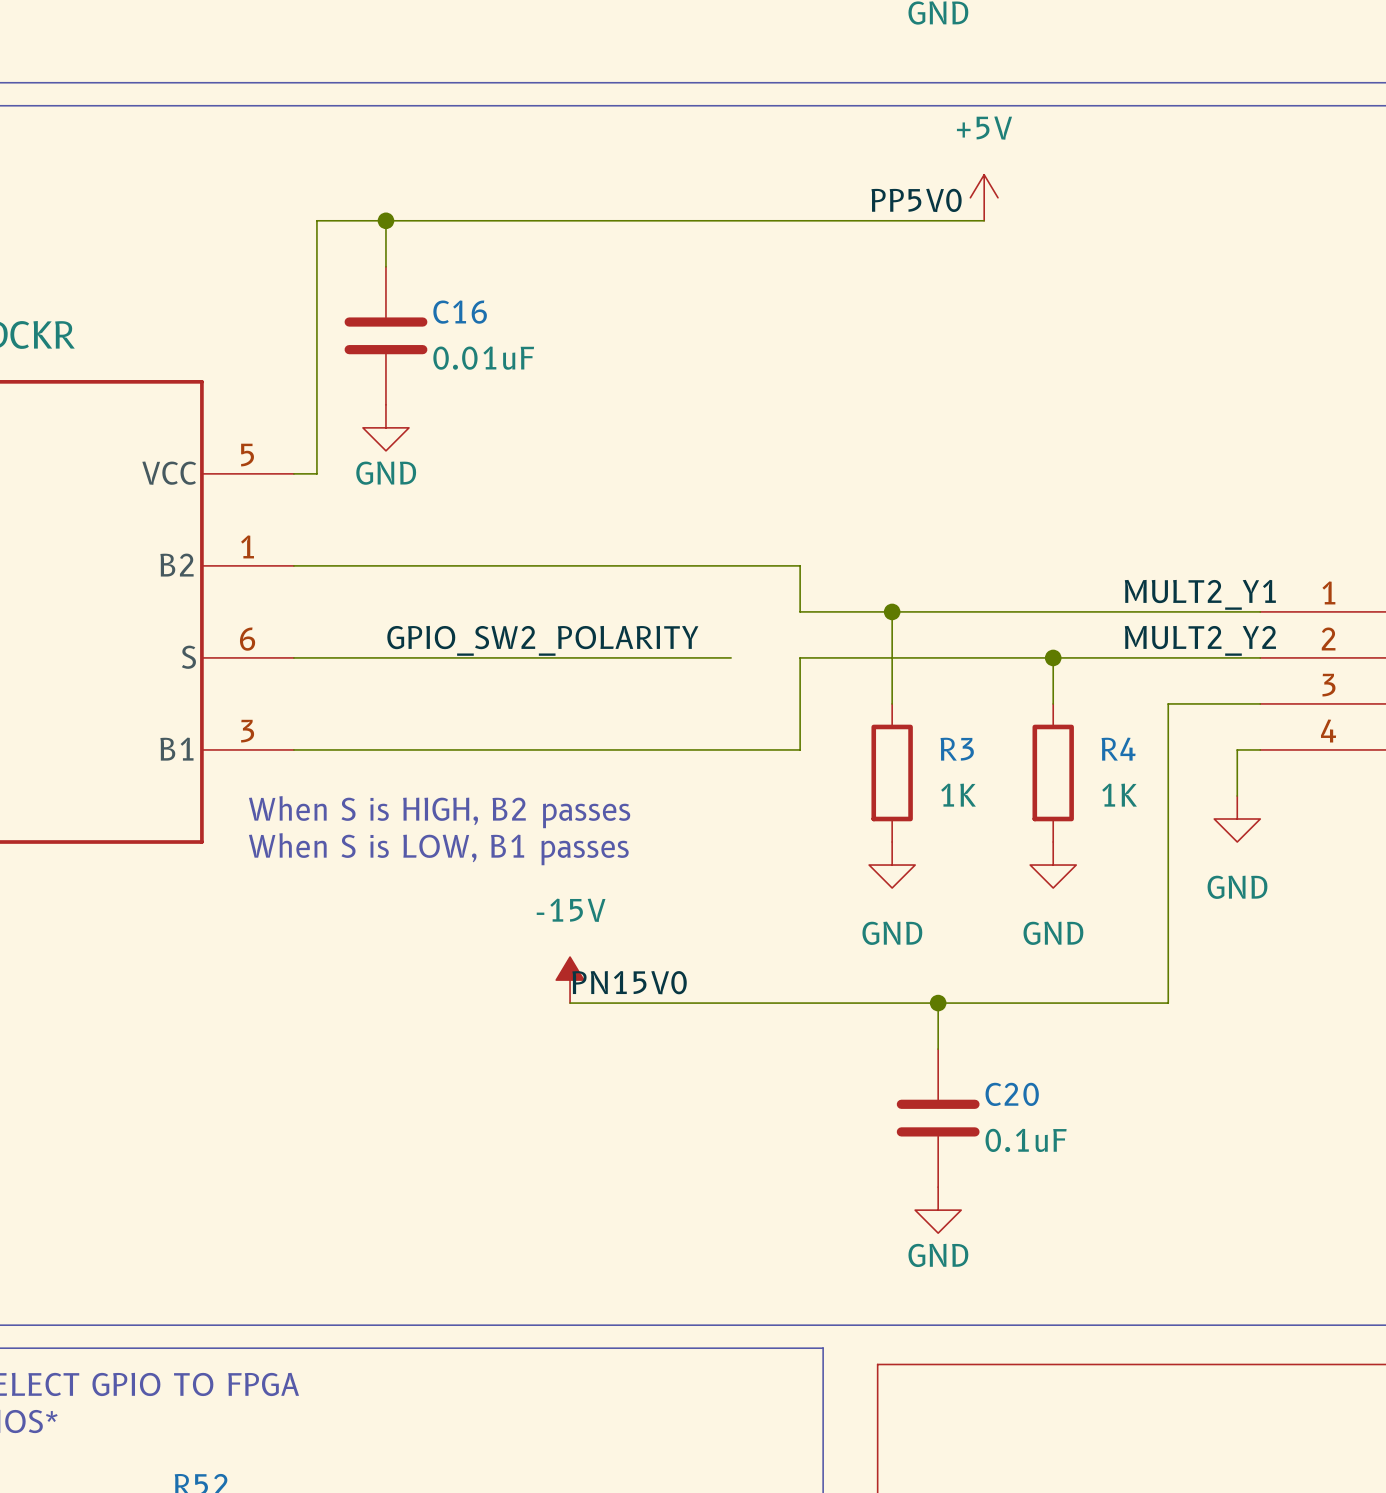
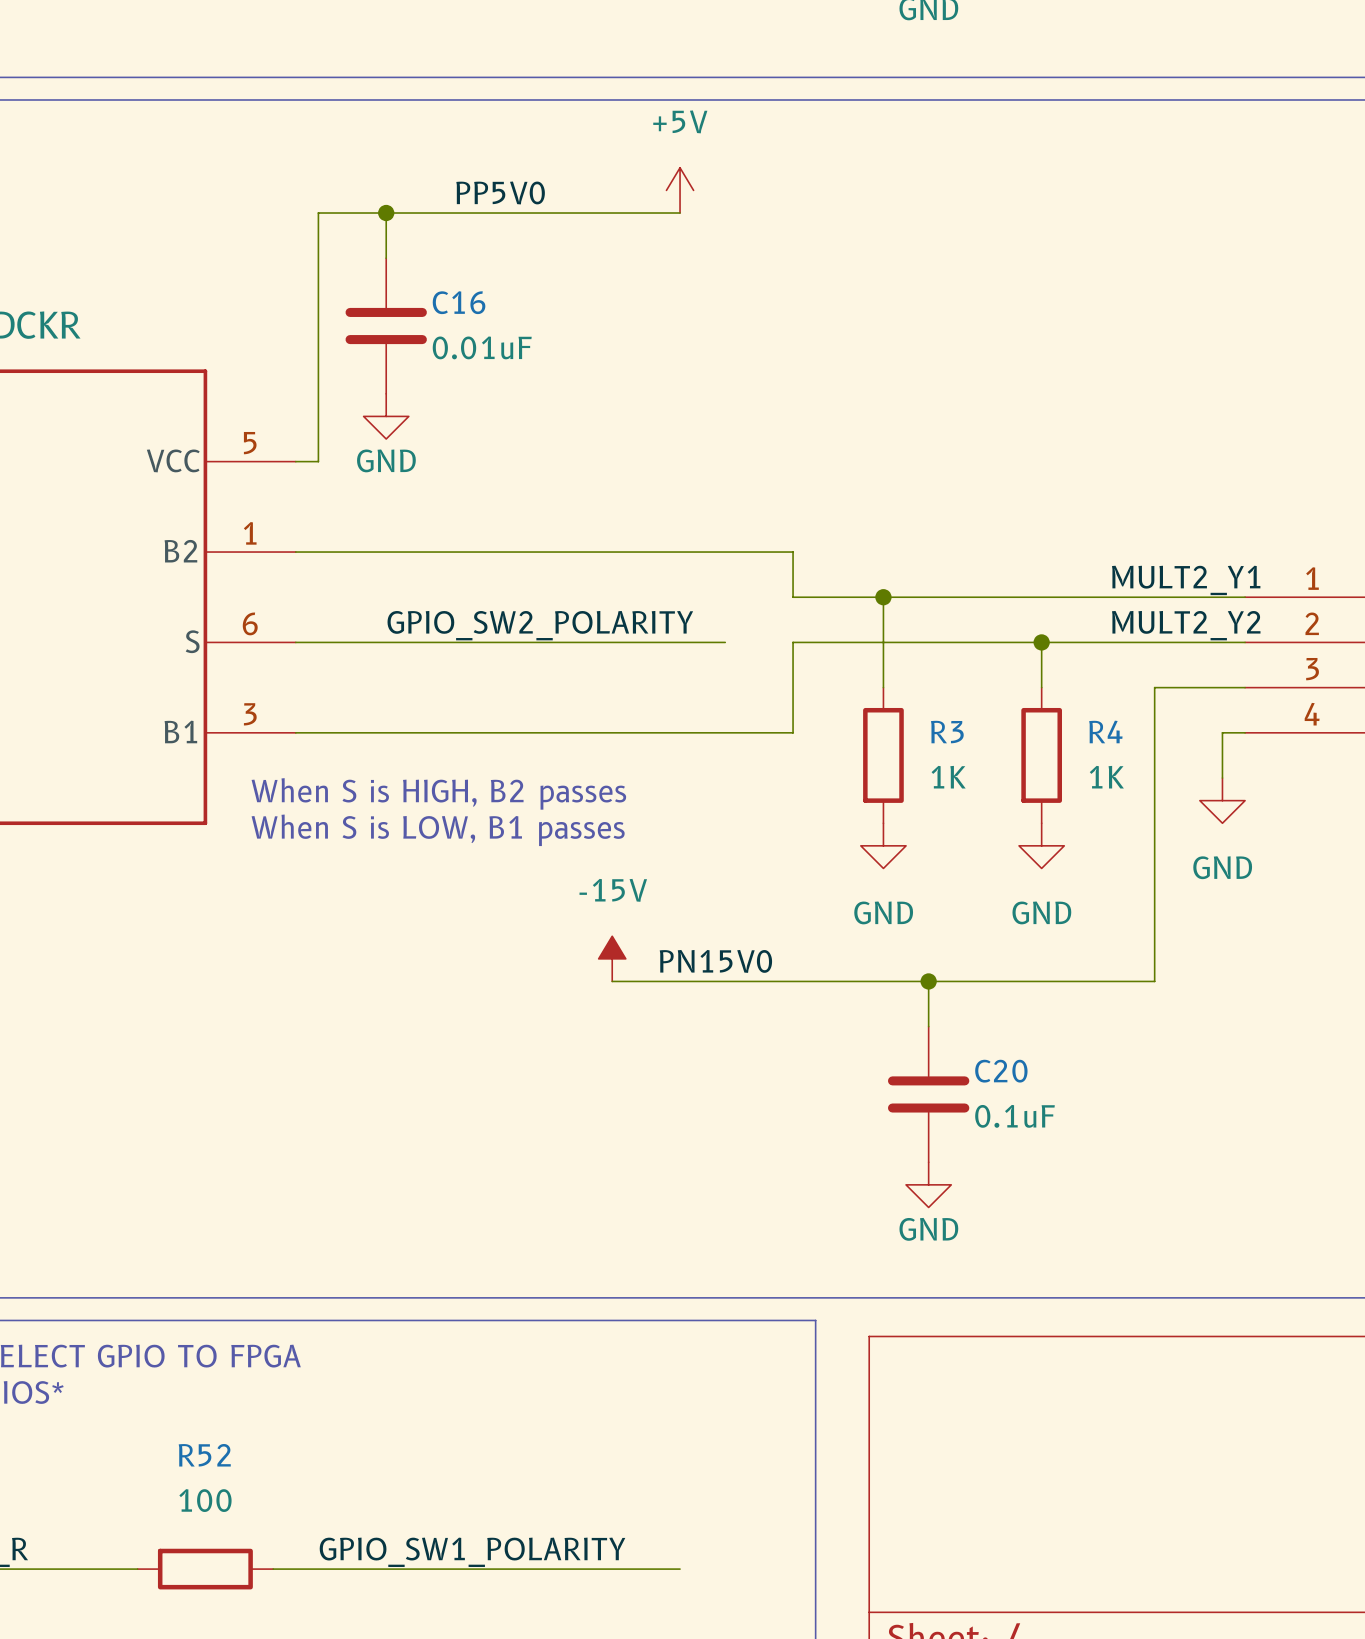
power symbol position: +5V (984, 197) -> +5V (680, 190)
label position: PP5V0 (916, 200) -> PP5V0 (500, 192)
wire: (685, 220) (984, 220) -> none
power symbol position: -15V (570, 980) -> -15V (612, 958)
label position: PN15V0 (629, 982) -> PN15V0 (715, 961)
wire: (570, 1003) (616, 1003) -> none

